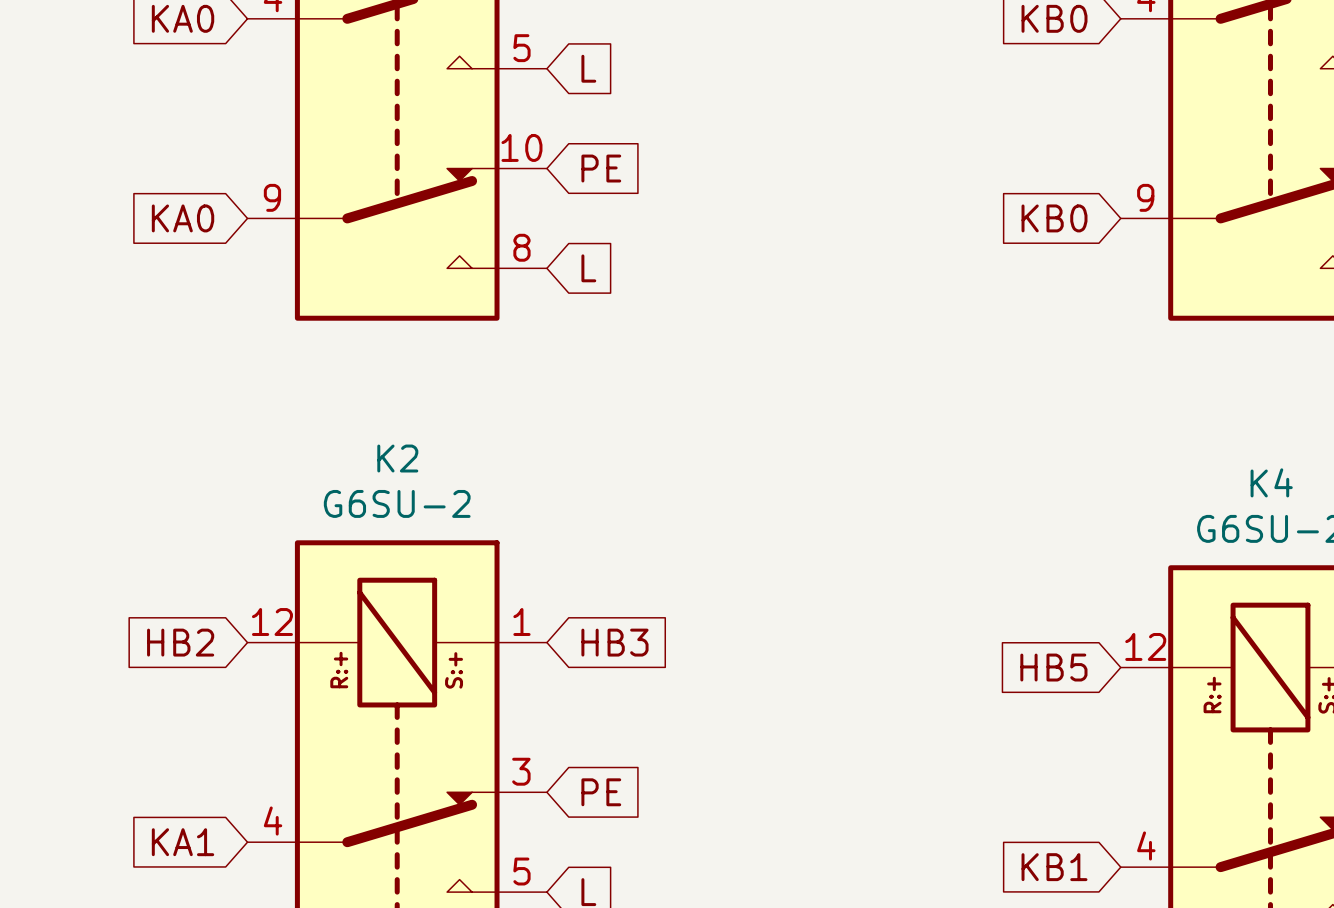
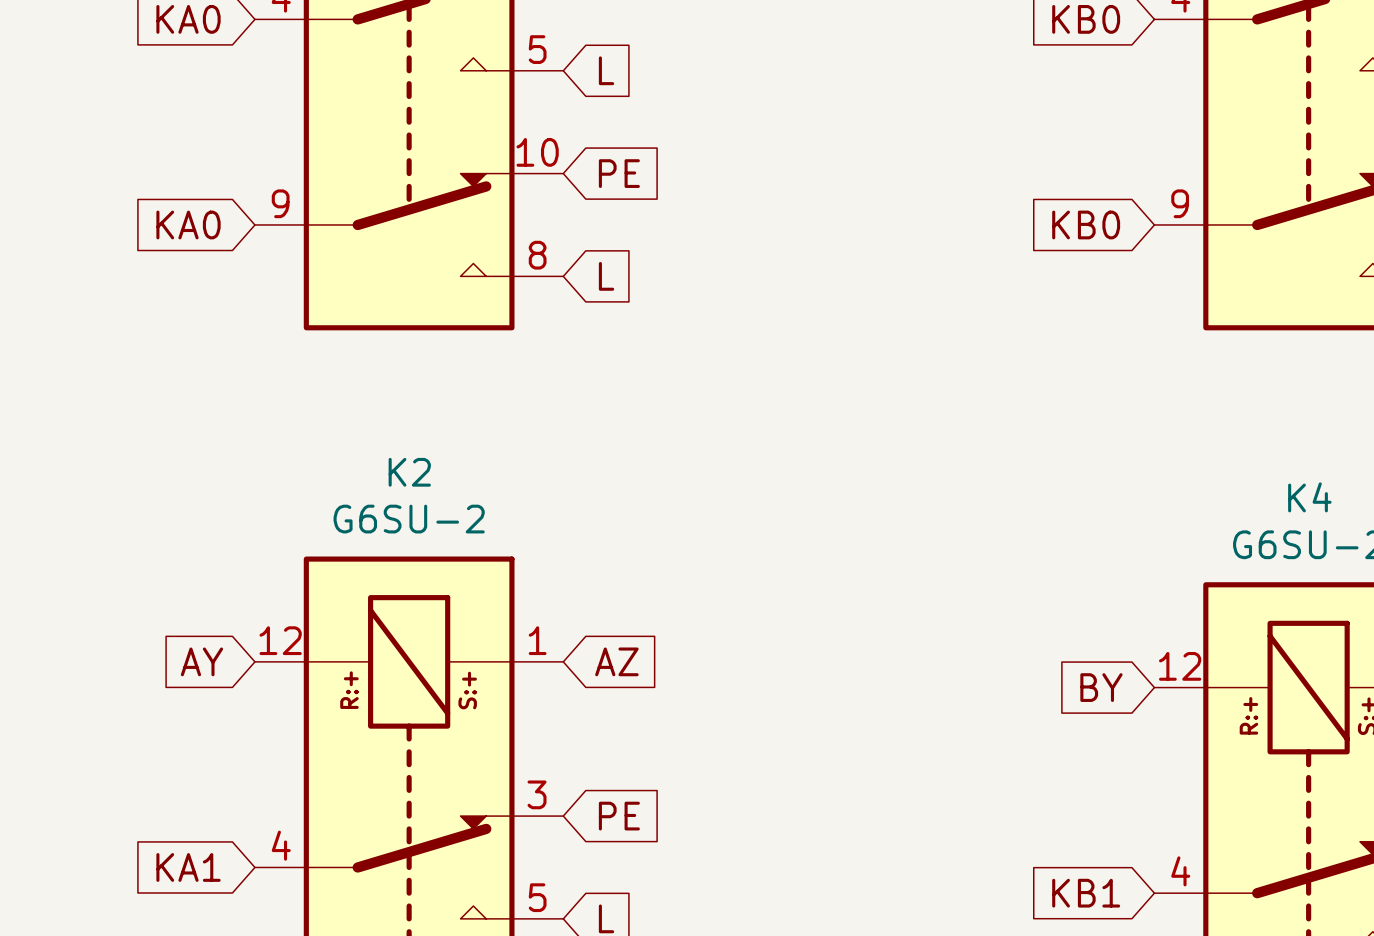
global label: HB2 (180, 642) -> AY (201, 661)
global label: HB3 (614, 642) -> AZ (616, 661)
global label: HB5 (1053, 667) -> BY (1101, 687)

